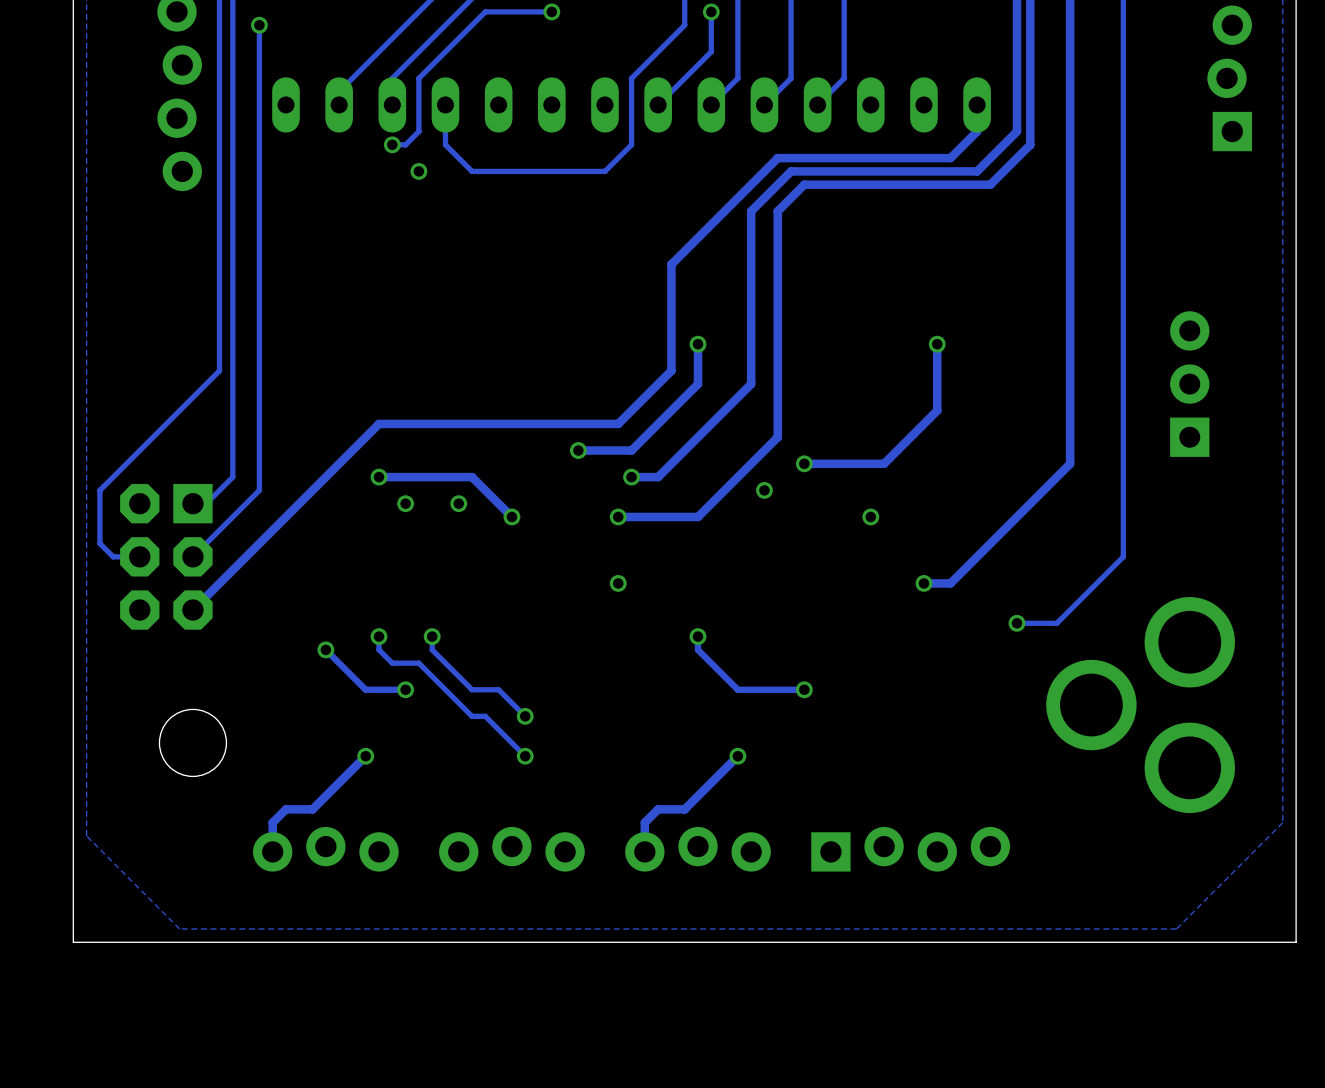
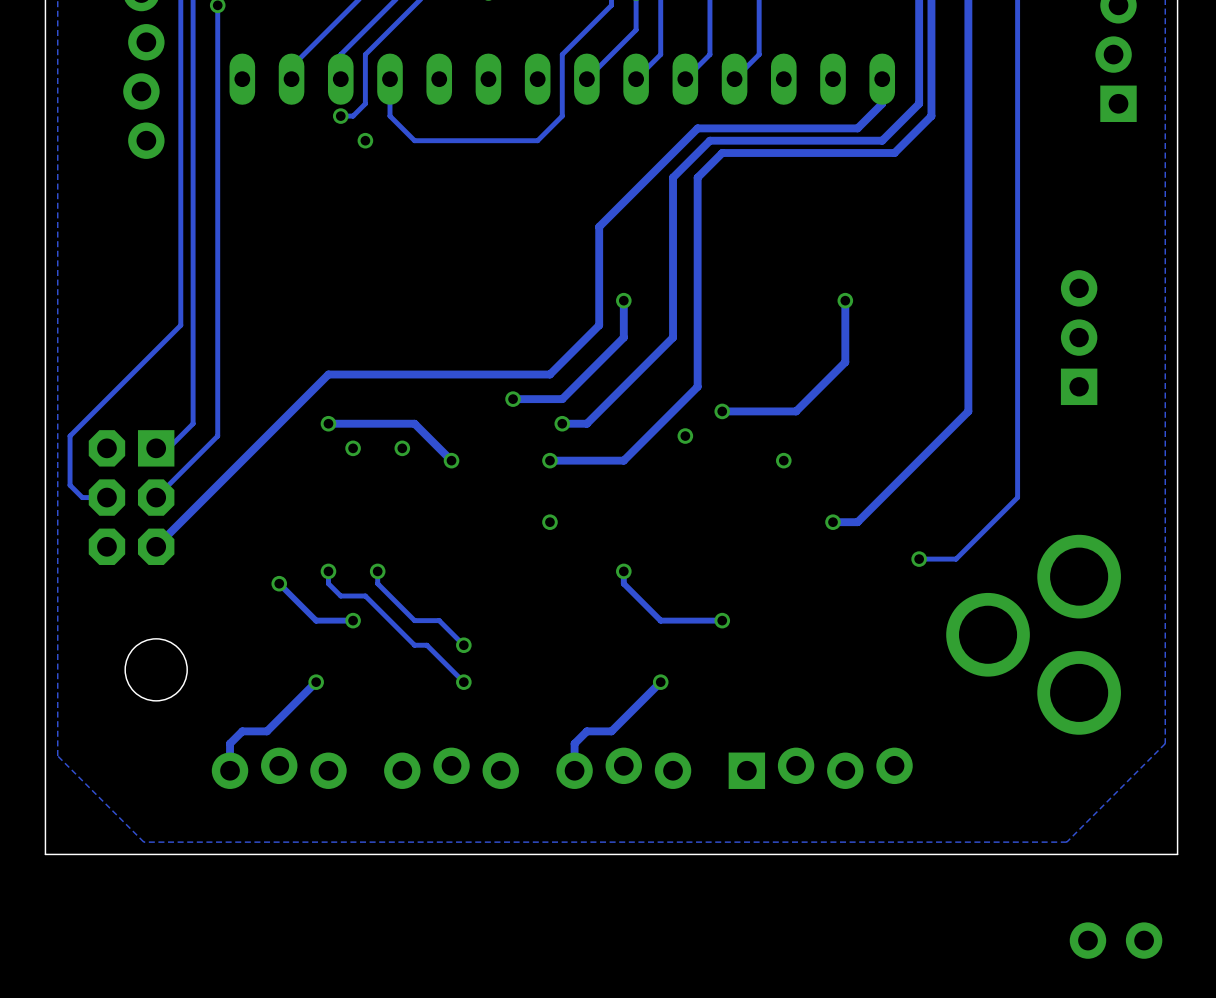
part: none -> (1116, 940)

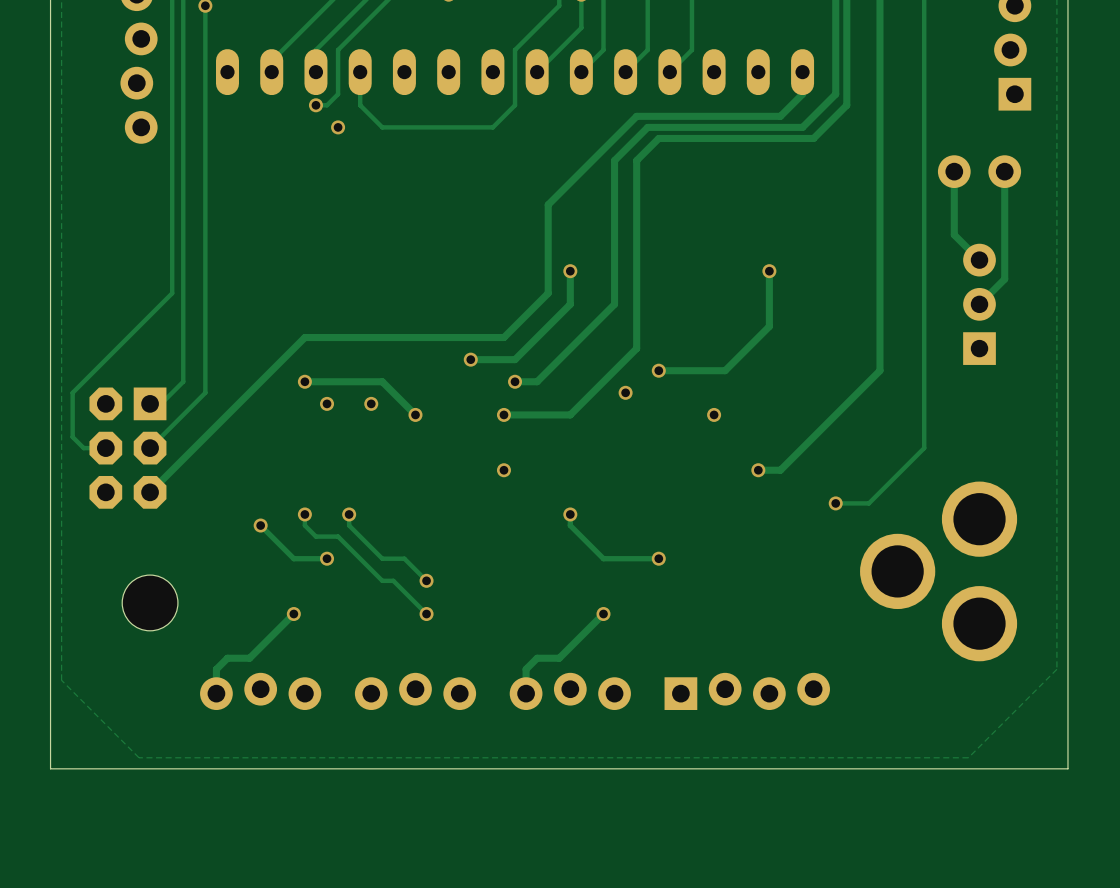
track: none -> (954, 171) (954, 234) (979, 260)
part: none -> (979, 171)
track: none -> (1004, 171) (1004, 279) (979, 304)
part: (1116, 940) -> none

